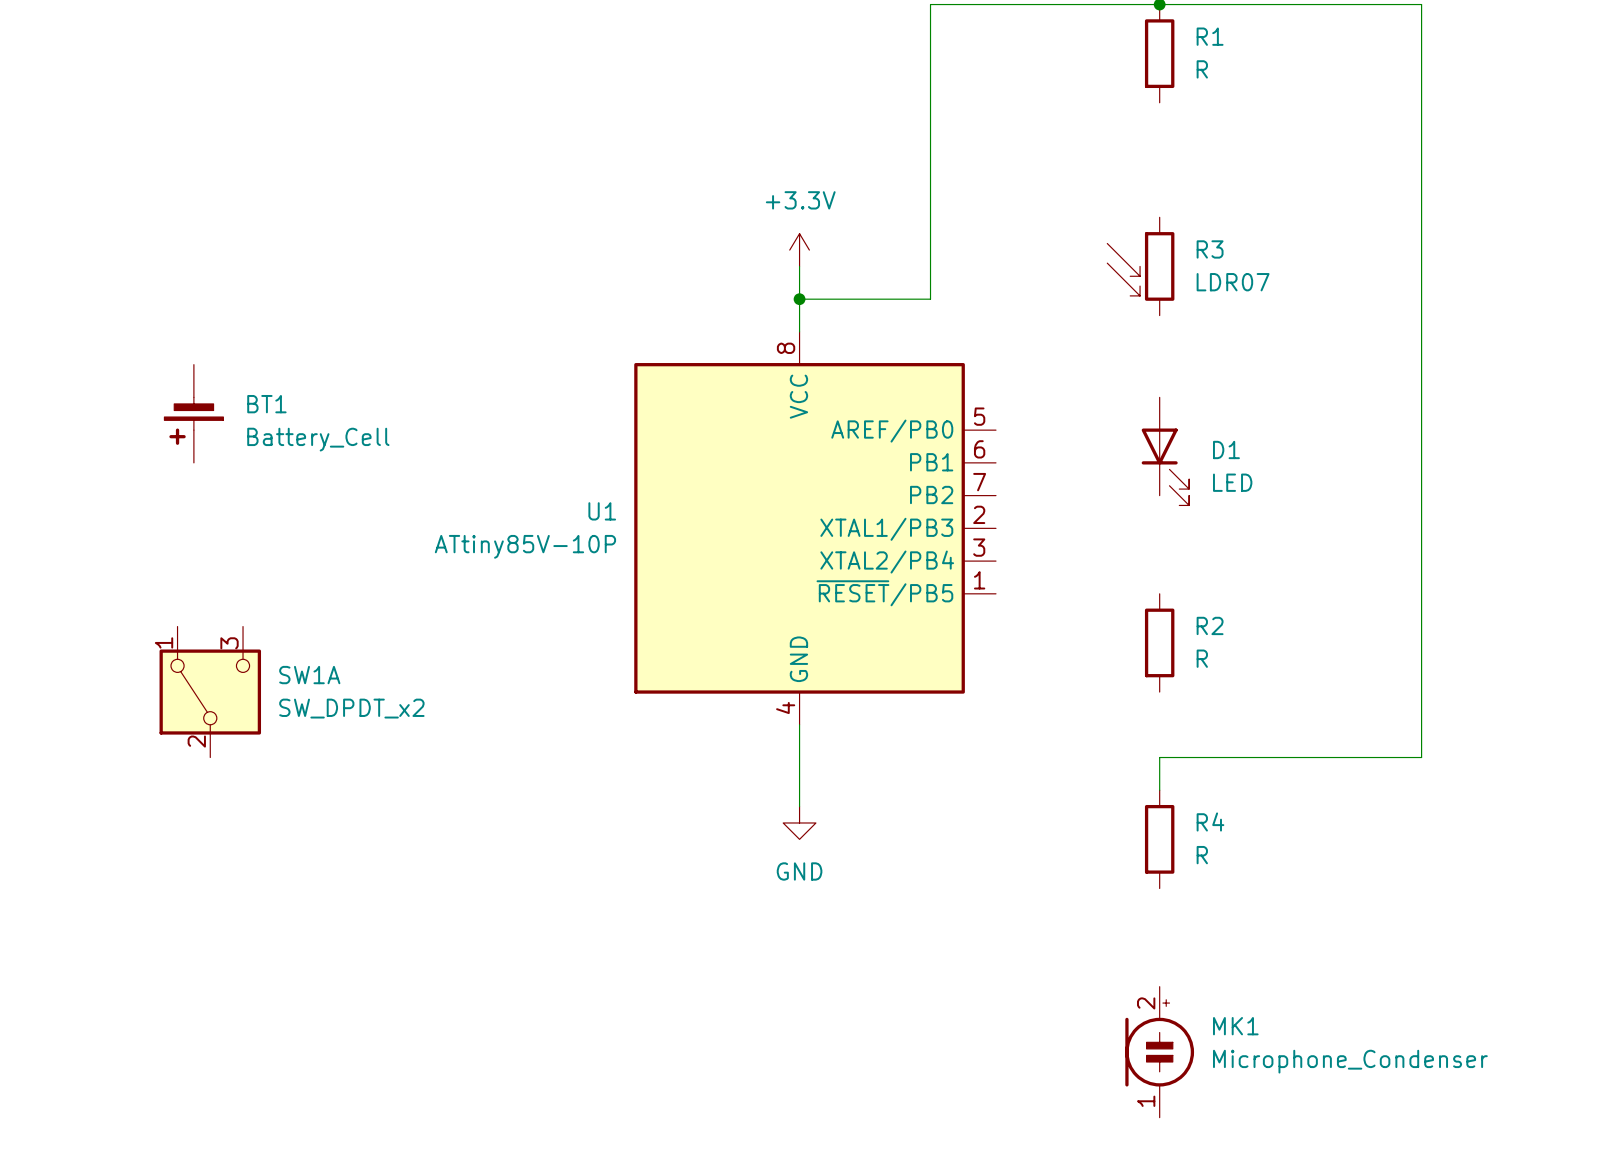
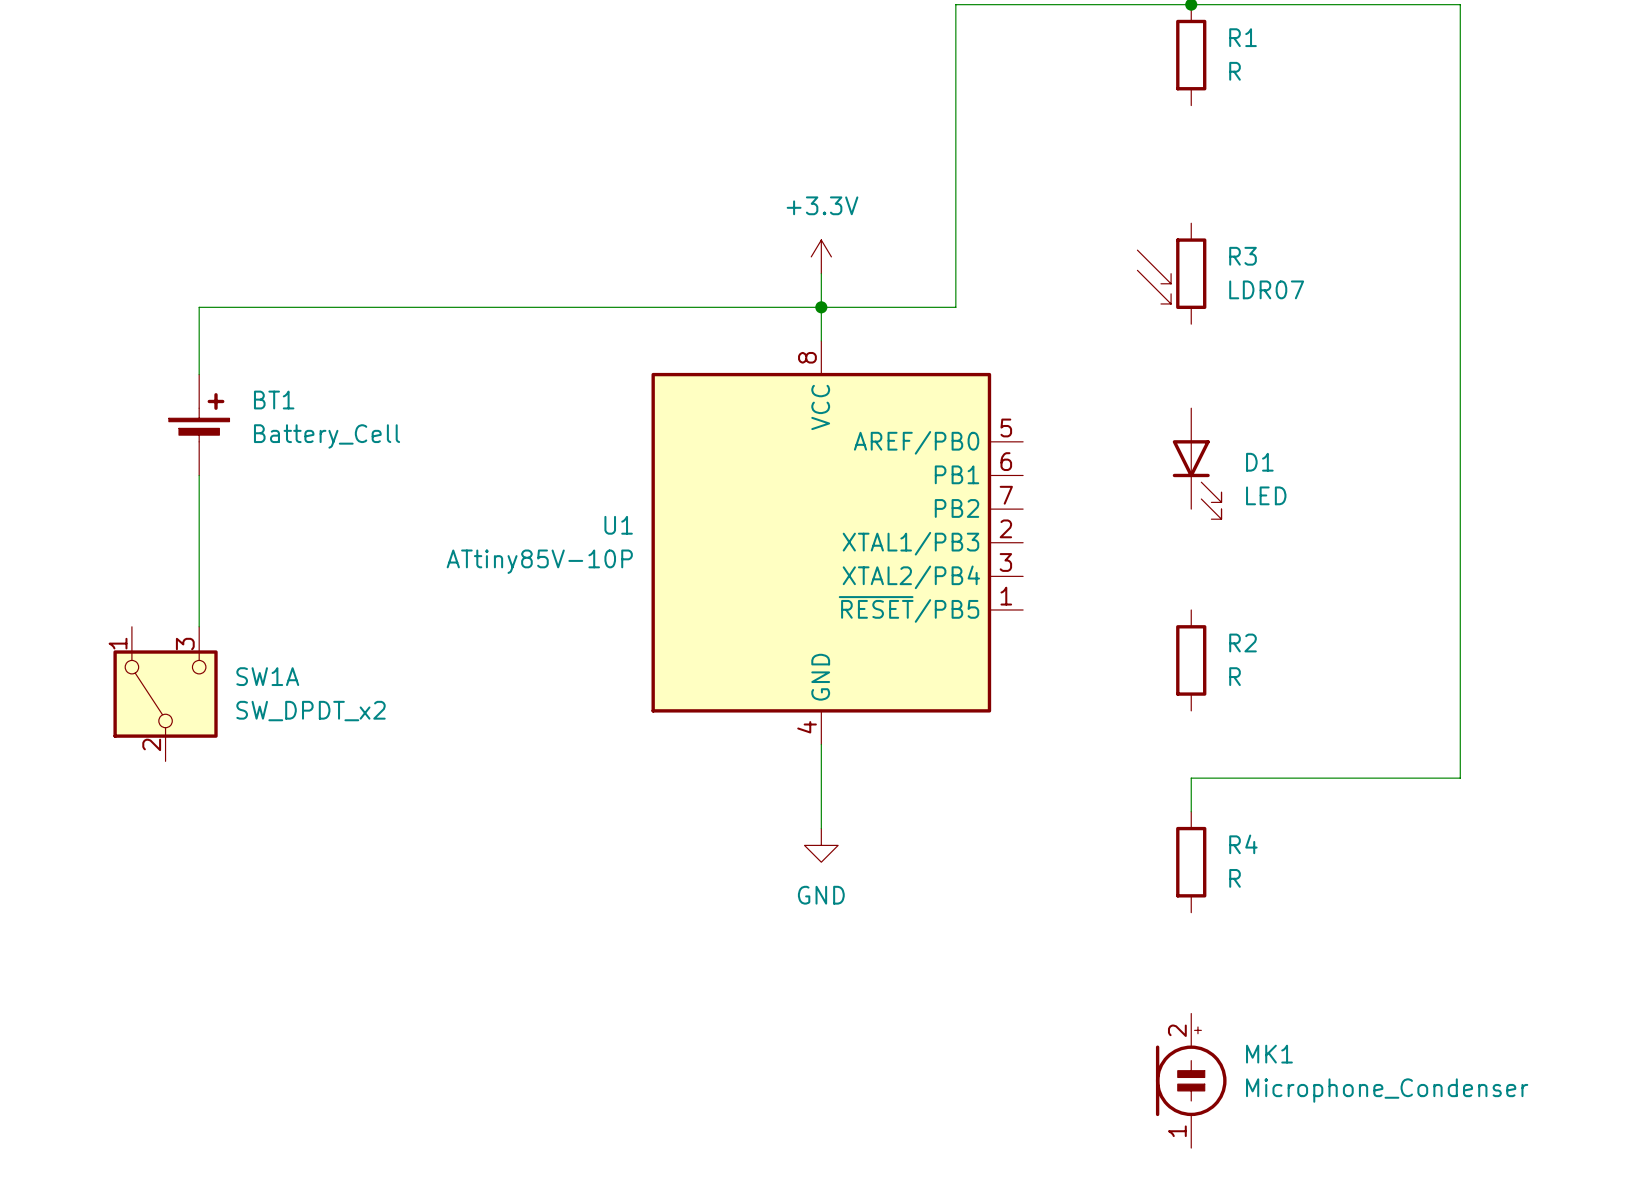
wire: none -> (821, 307) (199, 307) (199, 374)
BT1 rotation: 0° (193, 421) -> 180° (199, 417)
wire: none -> (199, 475) (199, 626)
SW1A position: (210, 692) -> (165, 694)

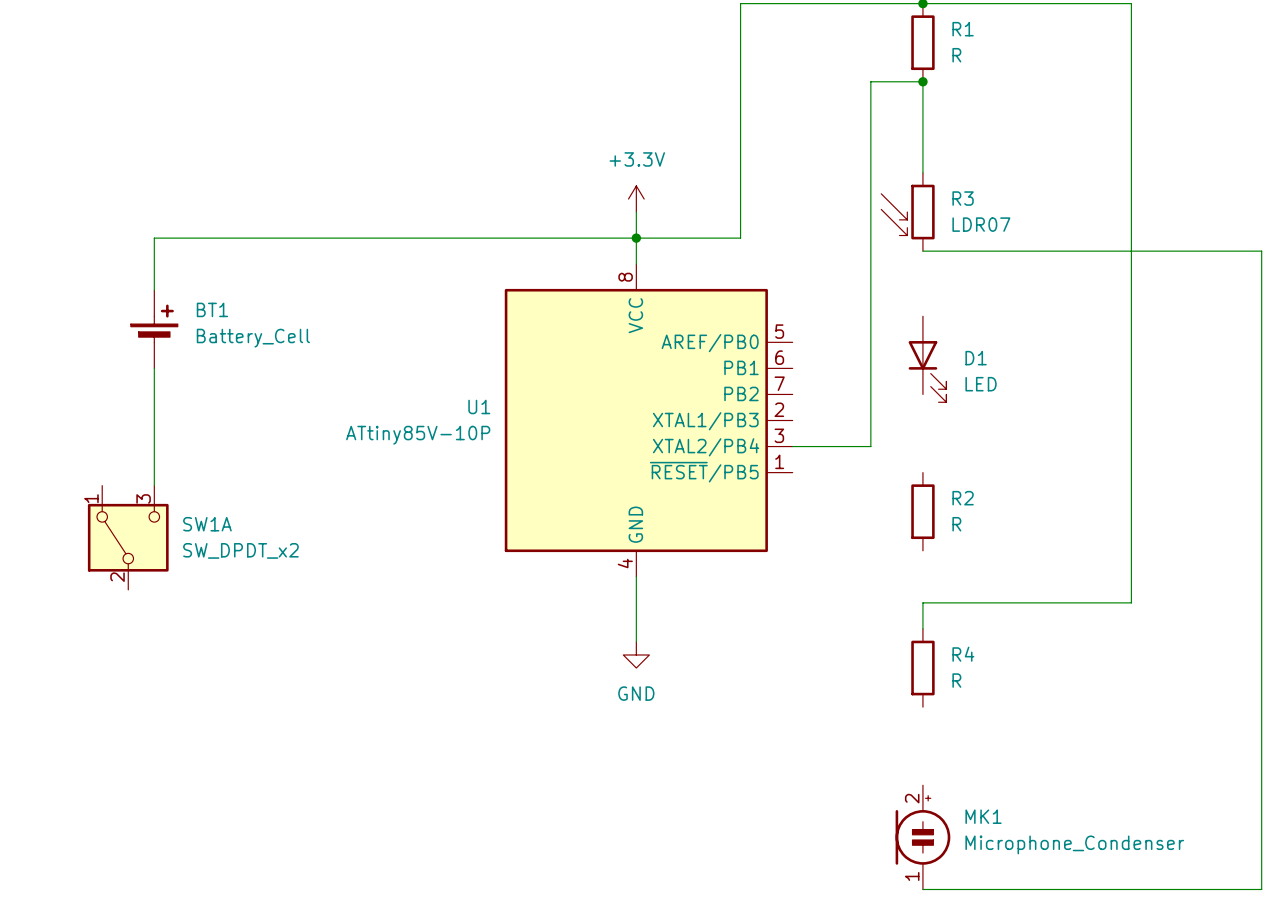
junction: none -> (922, 81)
wire: none -> (922, 172) (922, 81) (870, 81) (870, 446) (792, 446)
wire: none -> (922, 251) (1261, 251) (1261, 889) (922, 889)

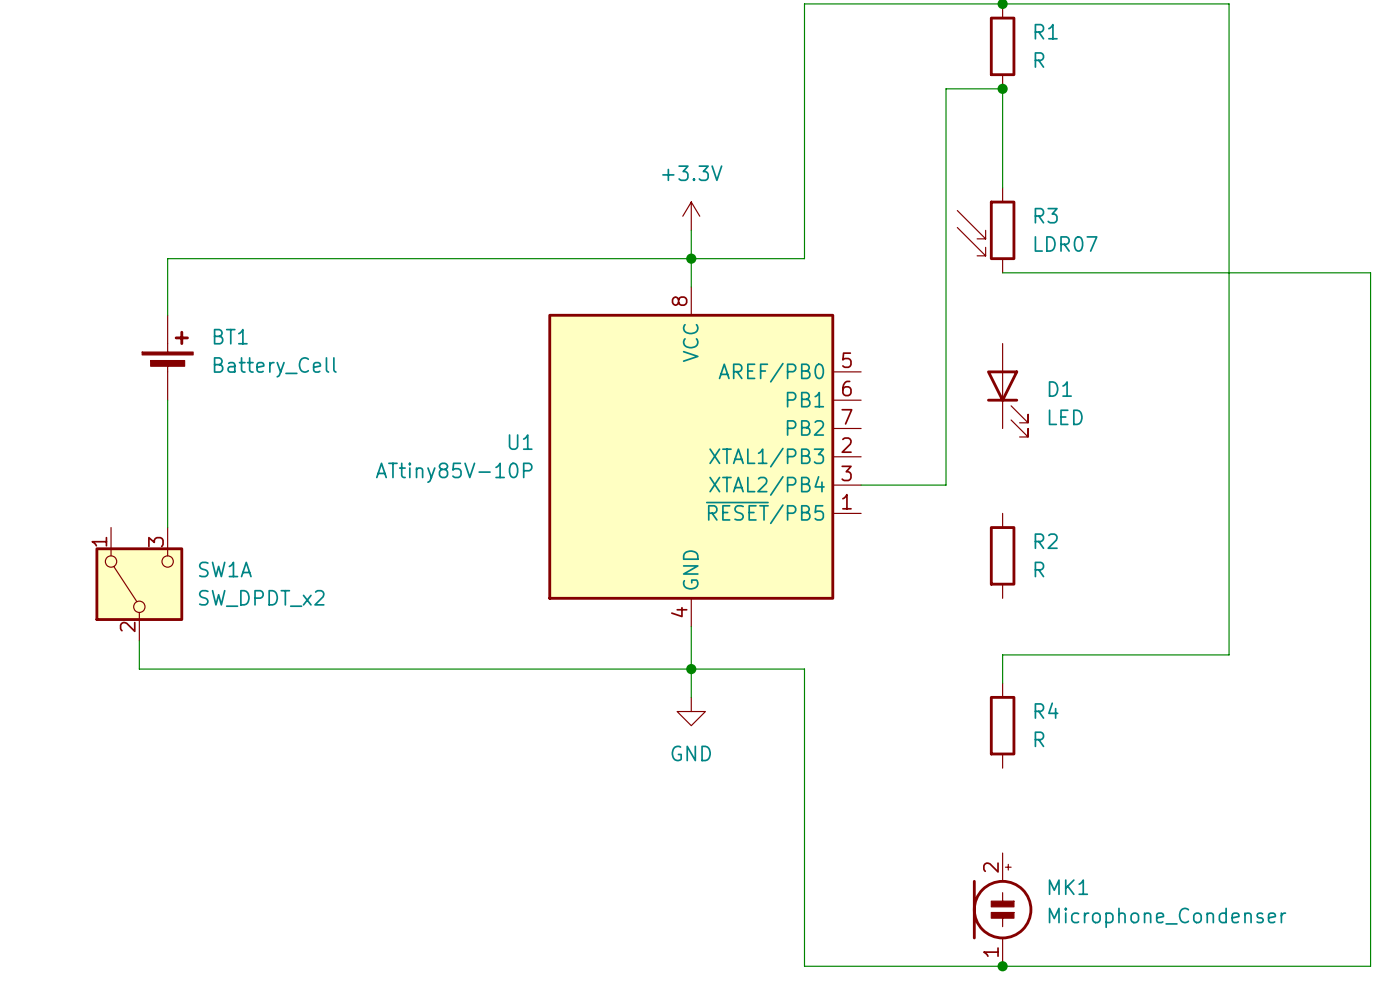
wire: none -> (139, 640) (139, 669) (804, 669) (804, 966) (1002, 966)
junction: none -> (691, 669)
junction: none -> (1002, 966)

